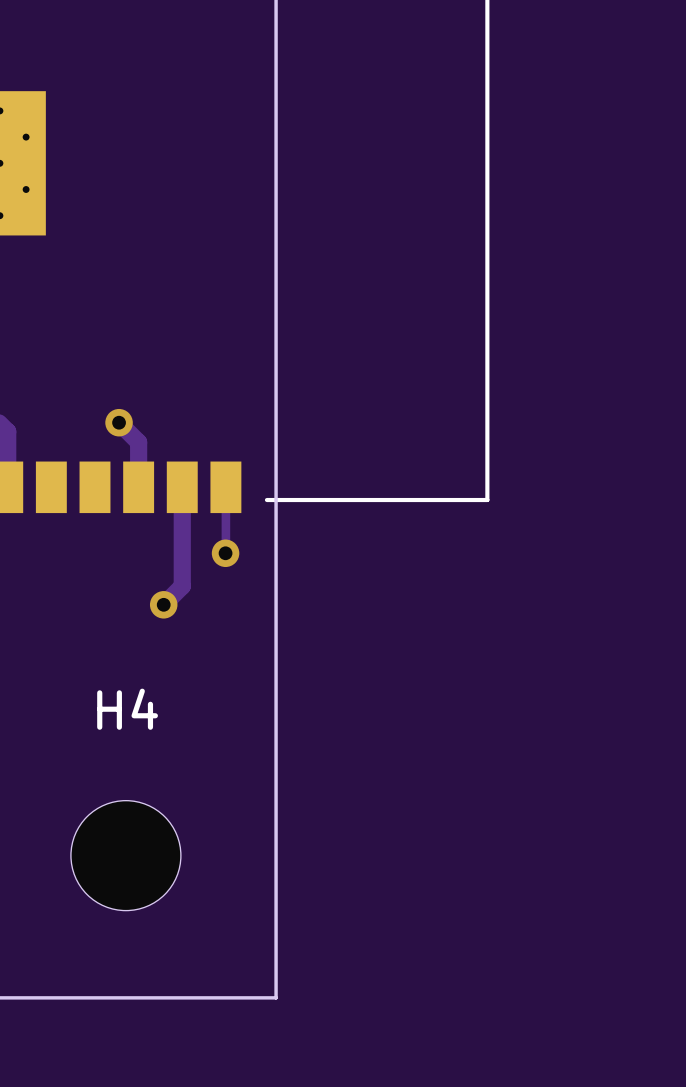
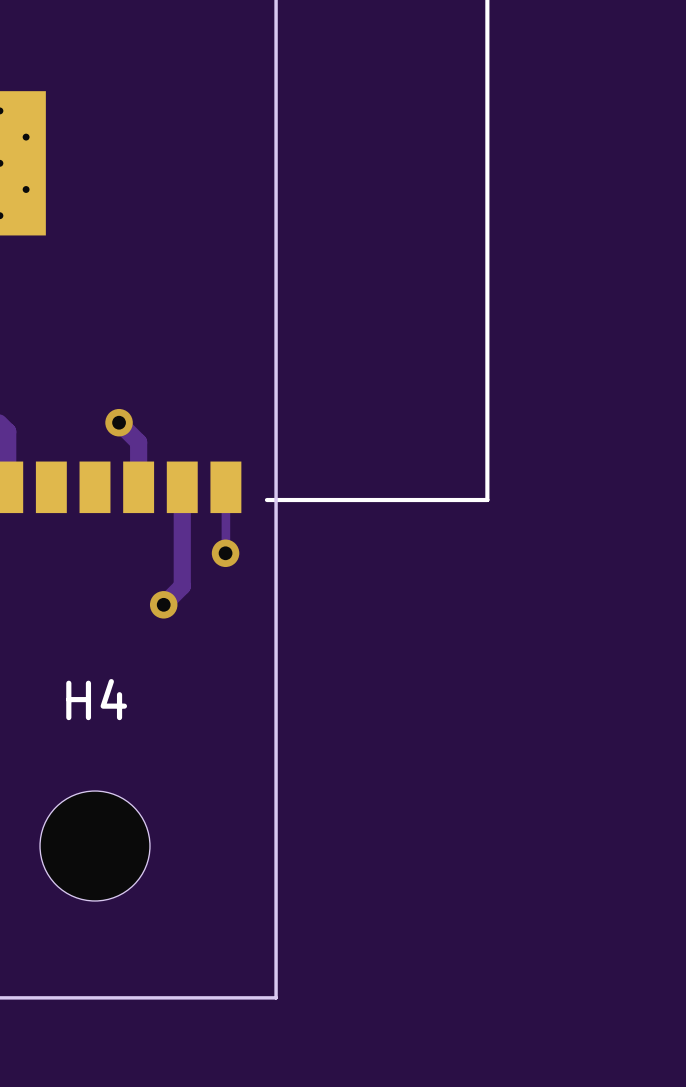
H4 position: (125, 855) -> (95, 846)

